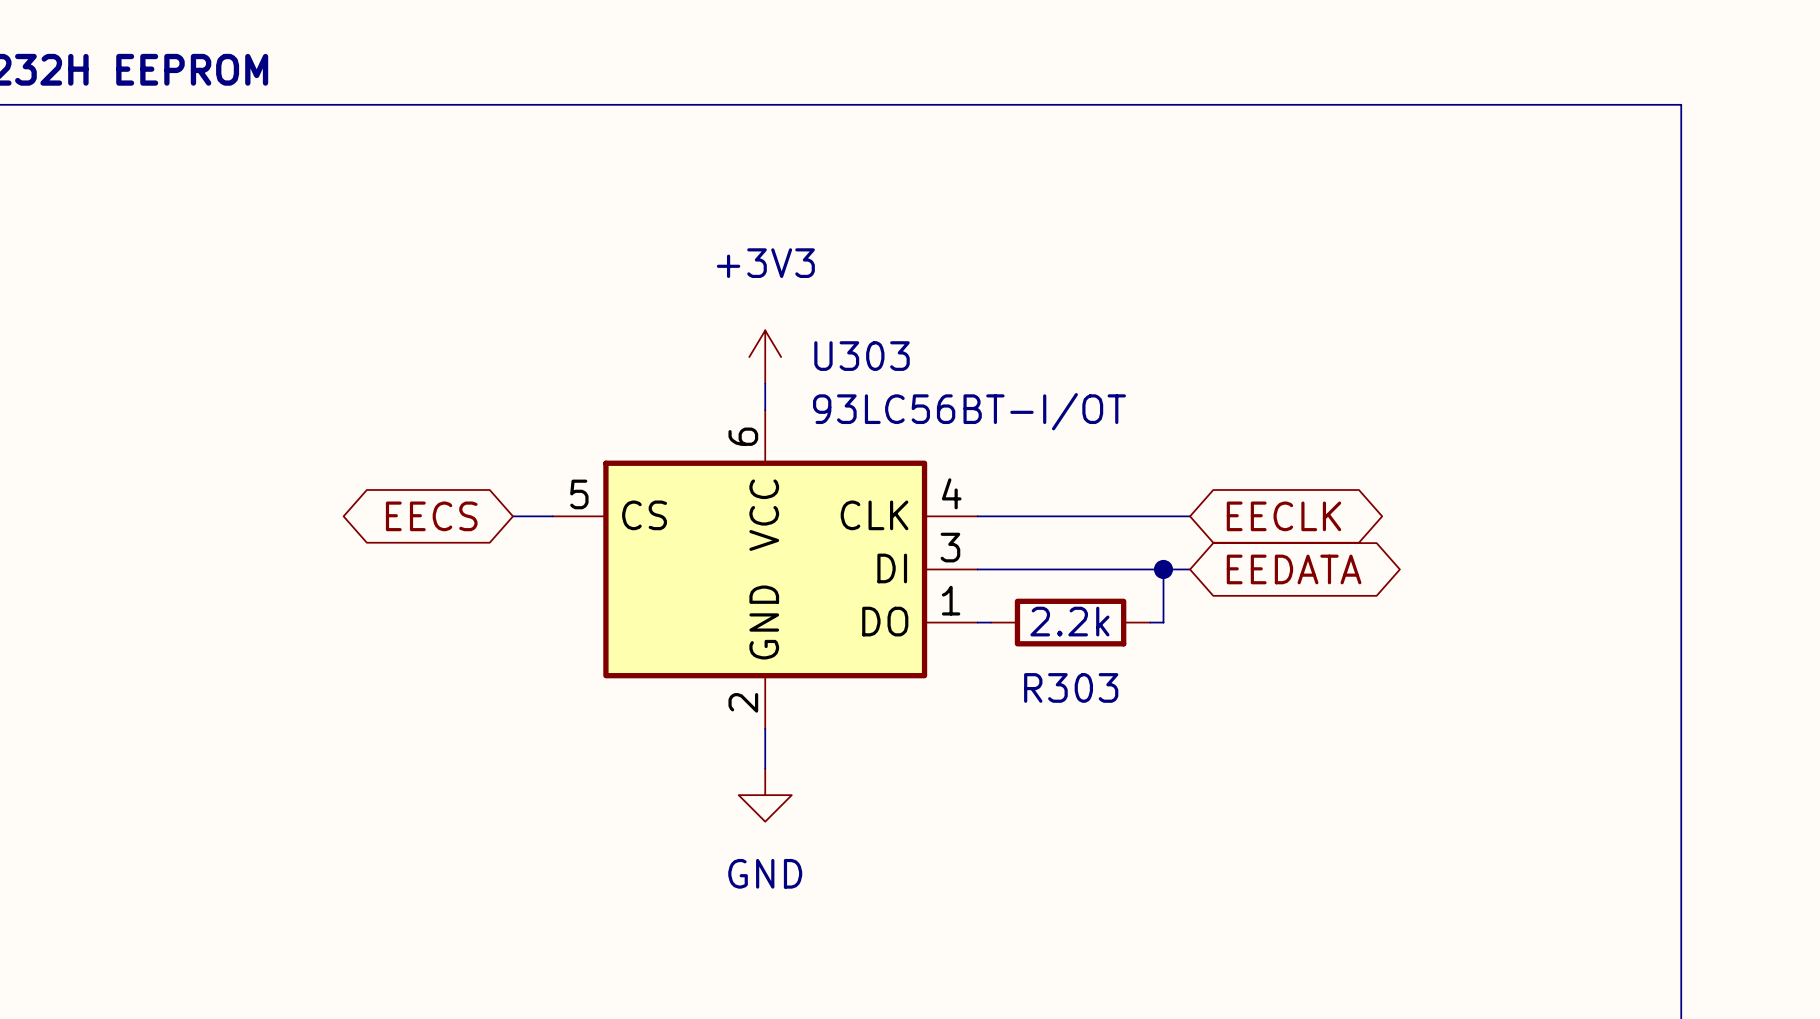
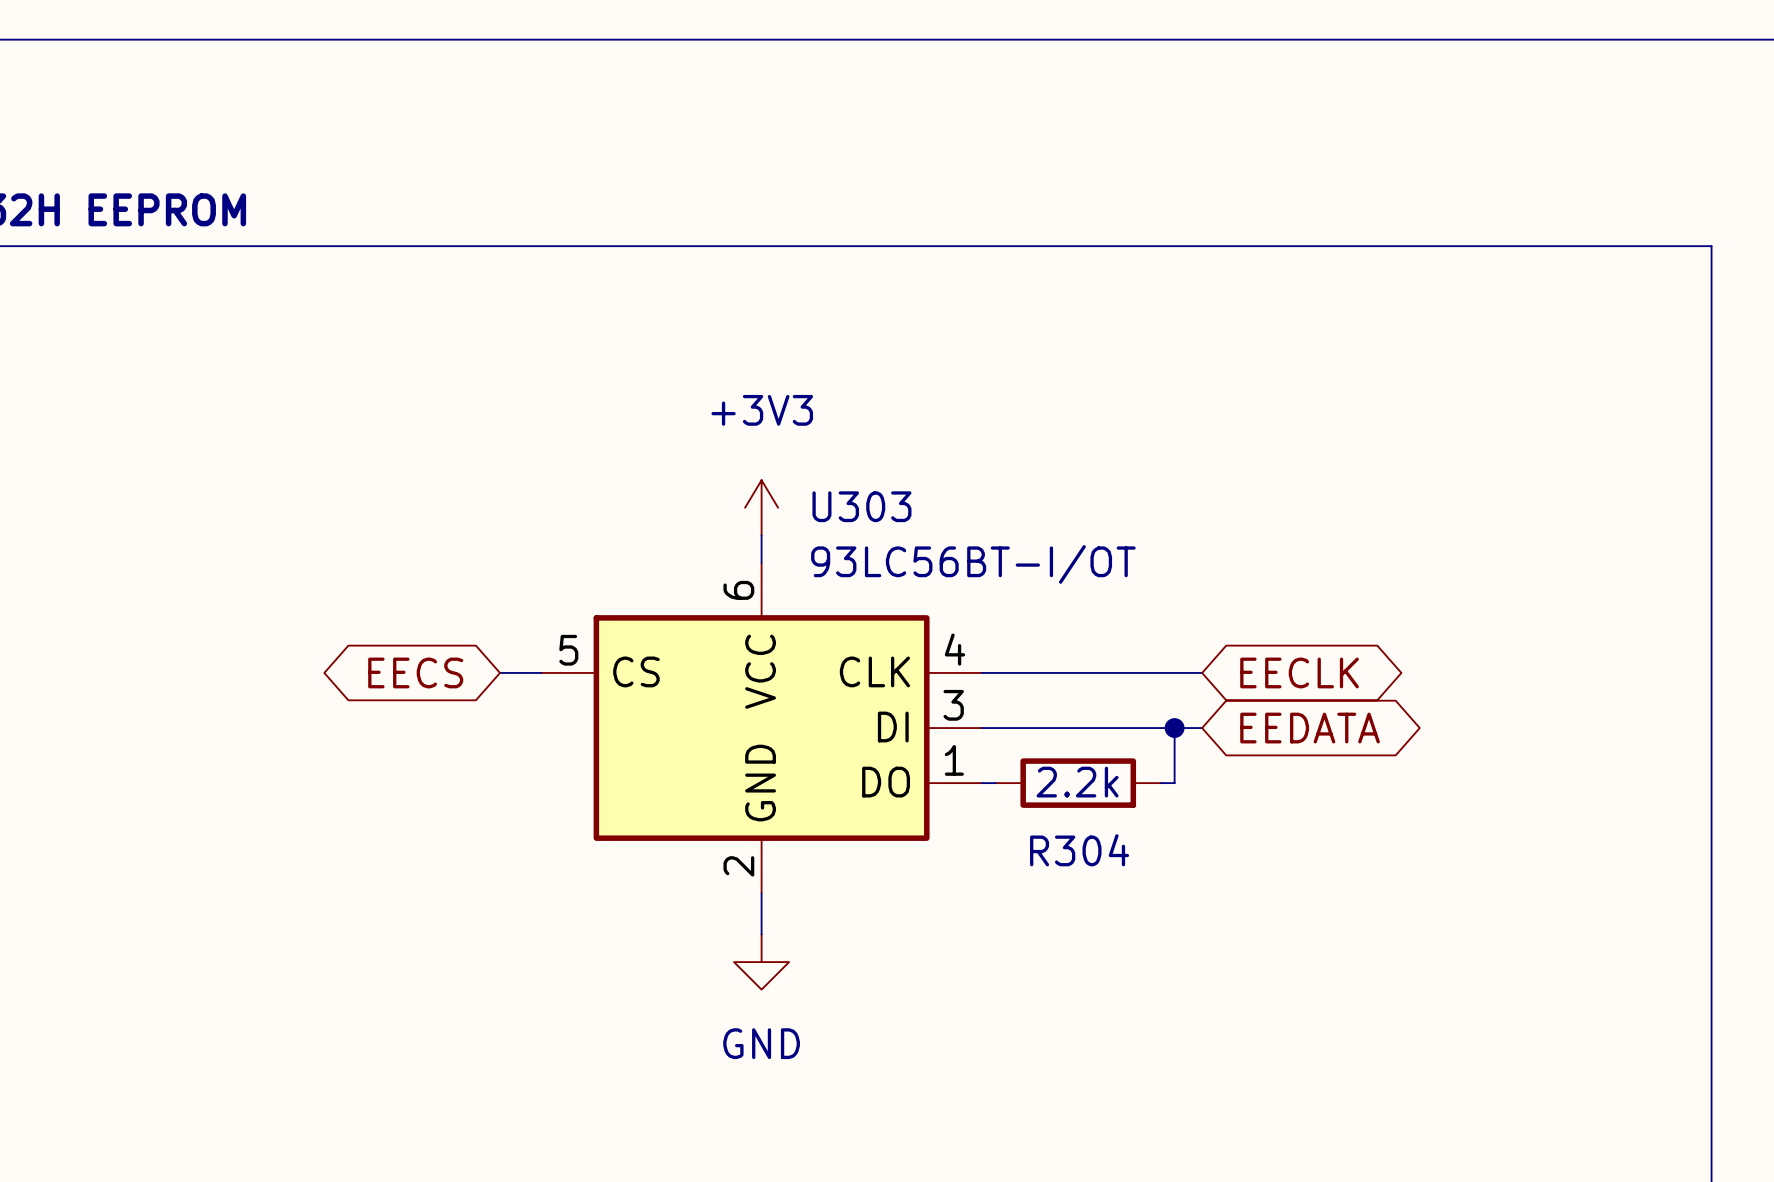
R303 name: R303 (1071, 687) -> R304 (1079, 850)

